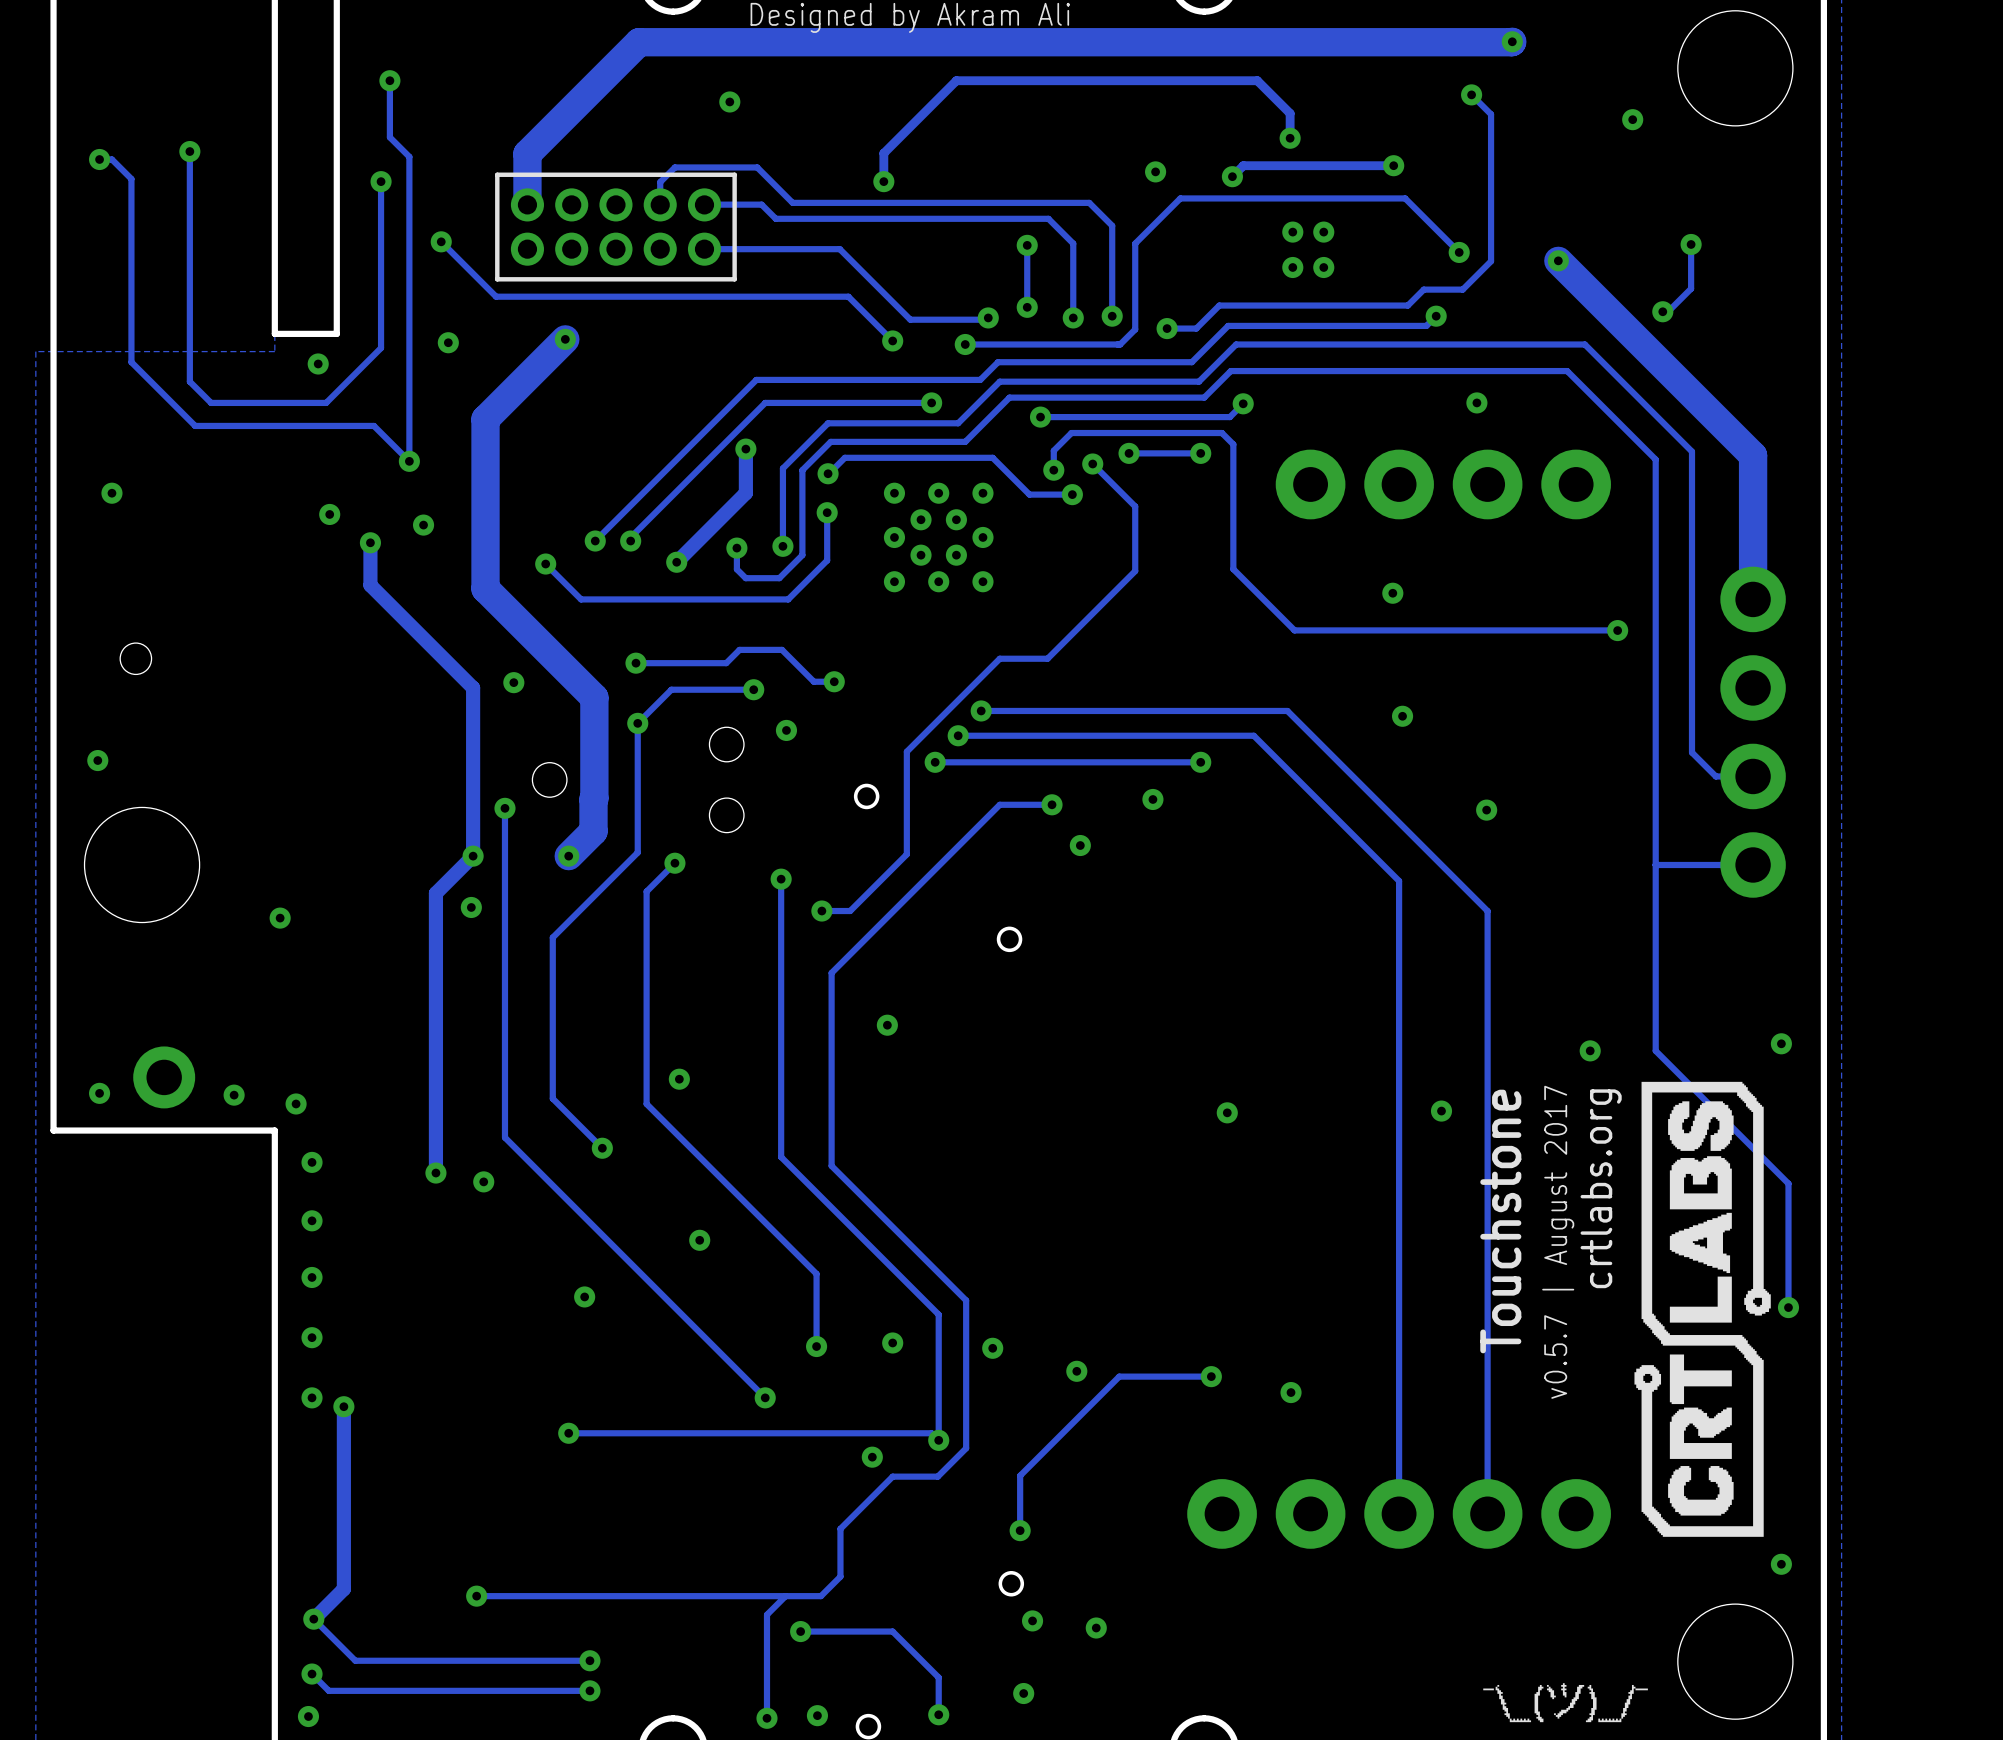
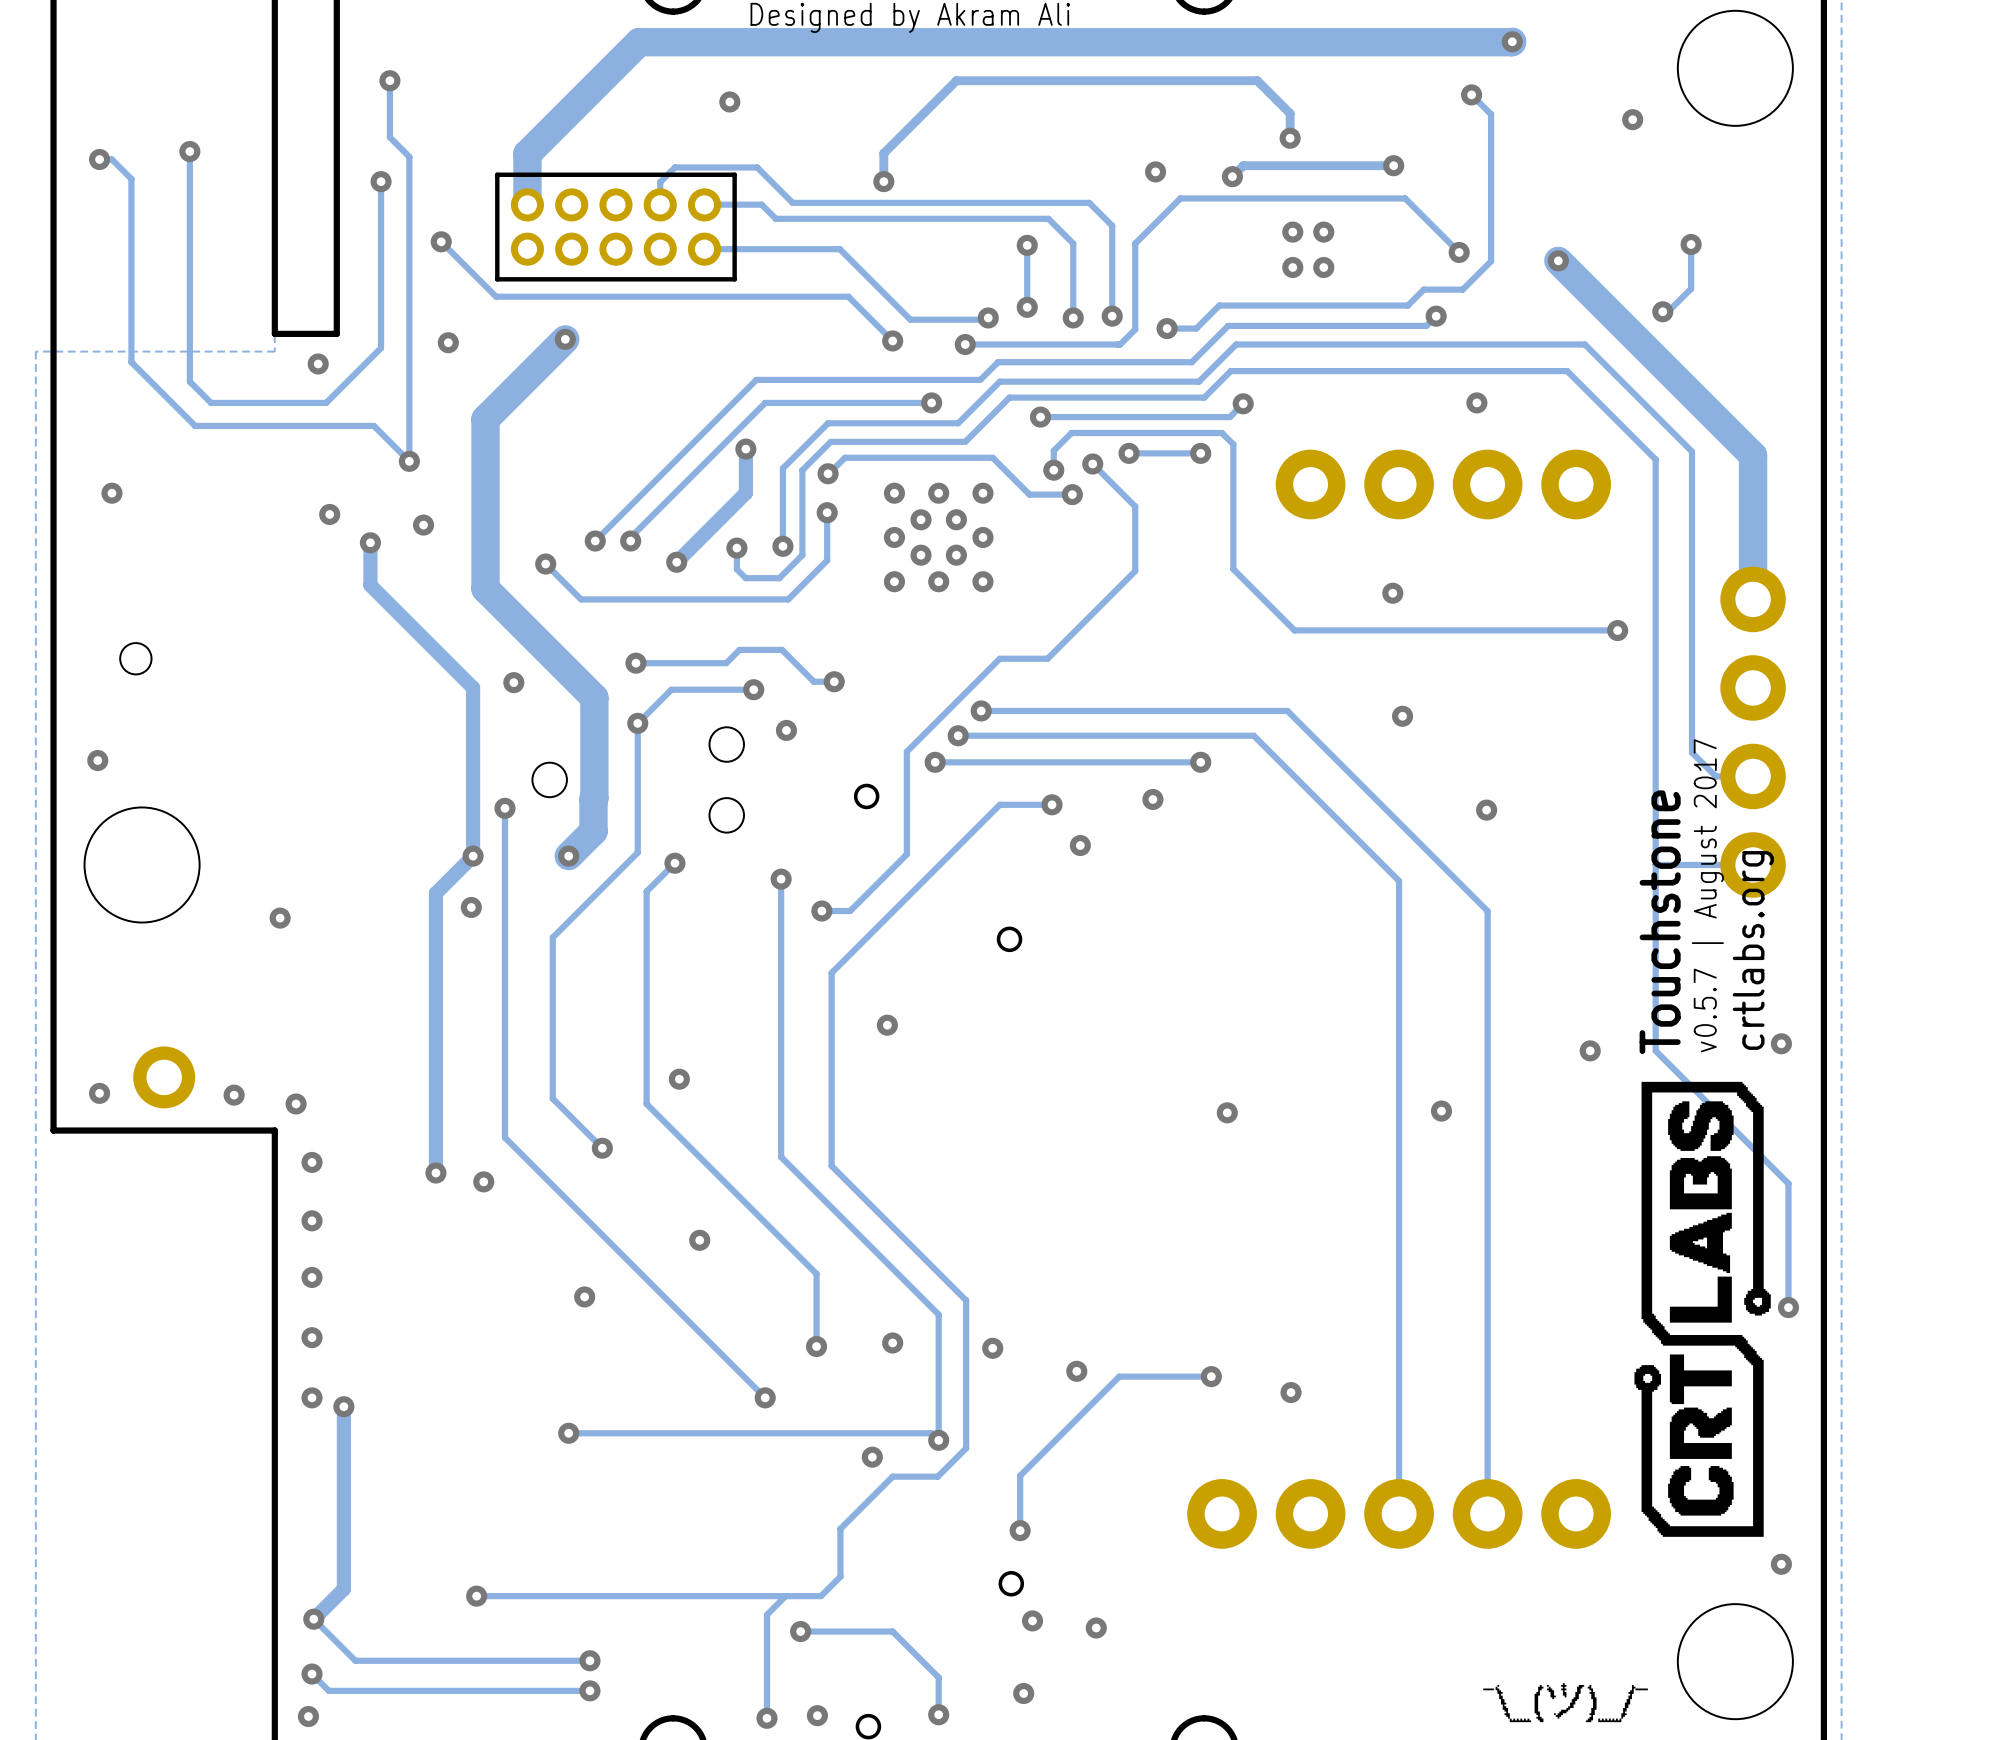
text position: crtlabs.org (1601, 1188) -> crtlabs.org (1753, 950)
text position: Touchstone (1500, 1221) -> Touchstone (1660, 922)
text position: v0.5.7 | August 2017 (1558, 1242) -> v0.5.7 | August 2017 (1707, 895)

